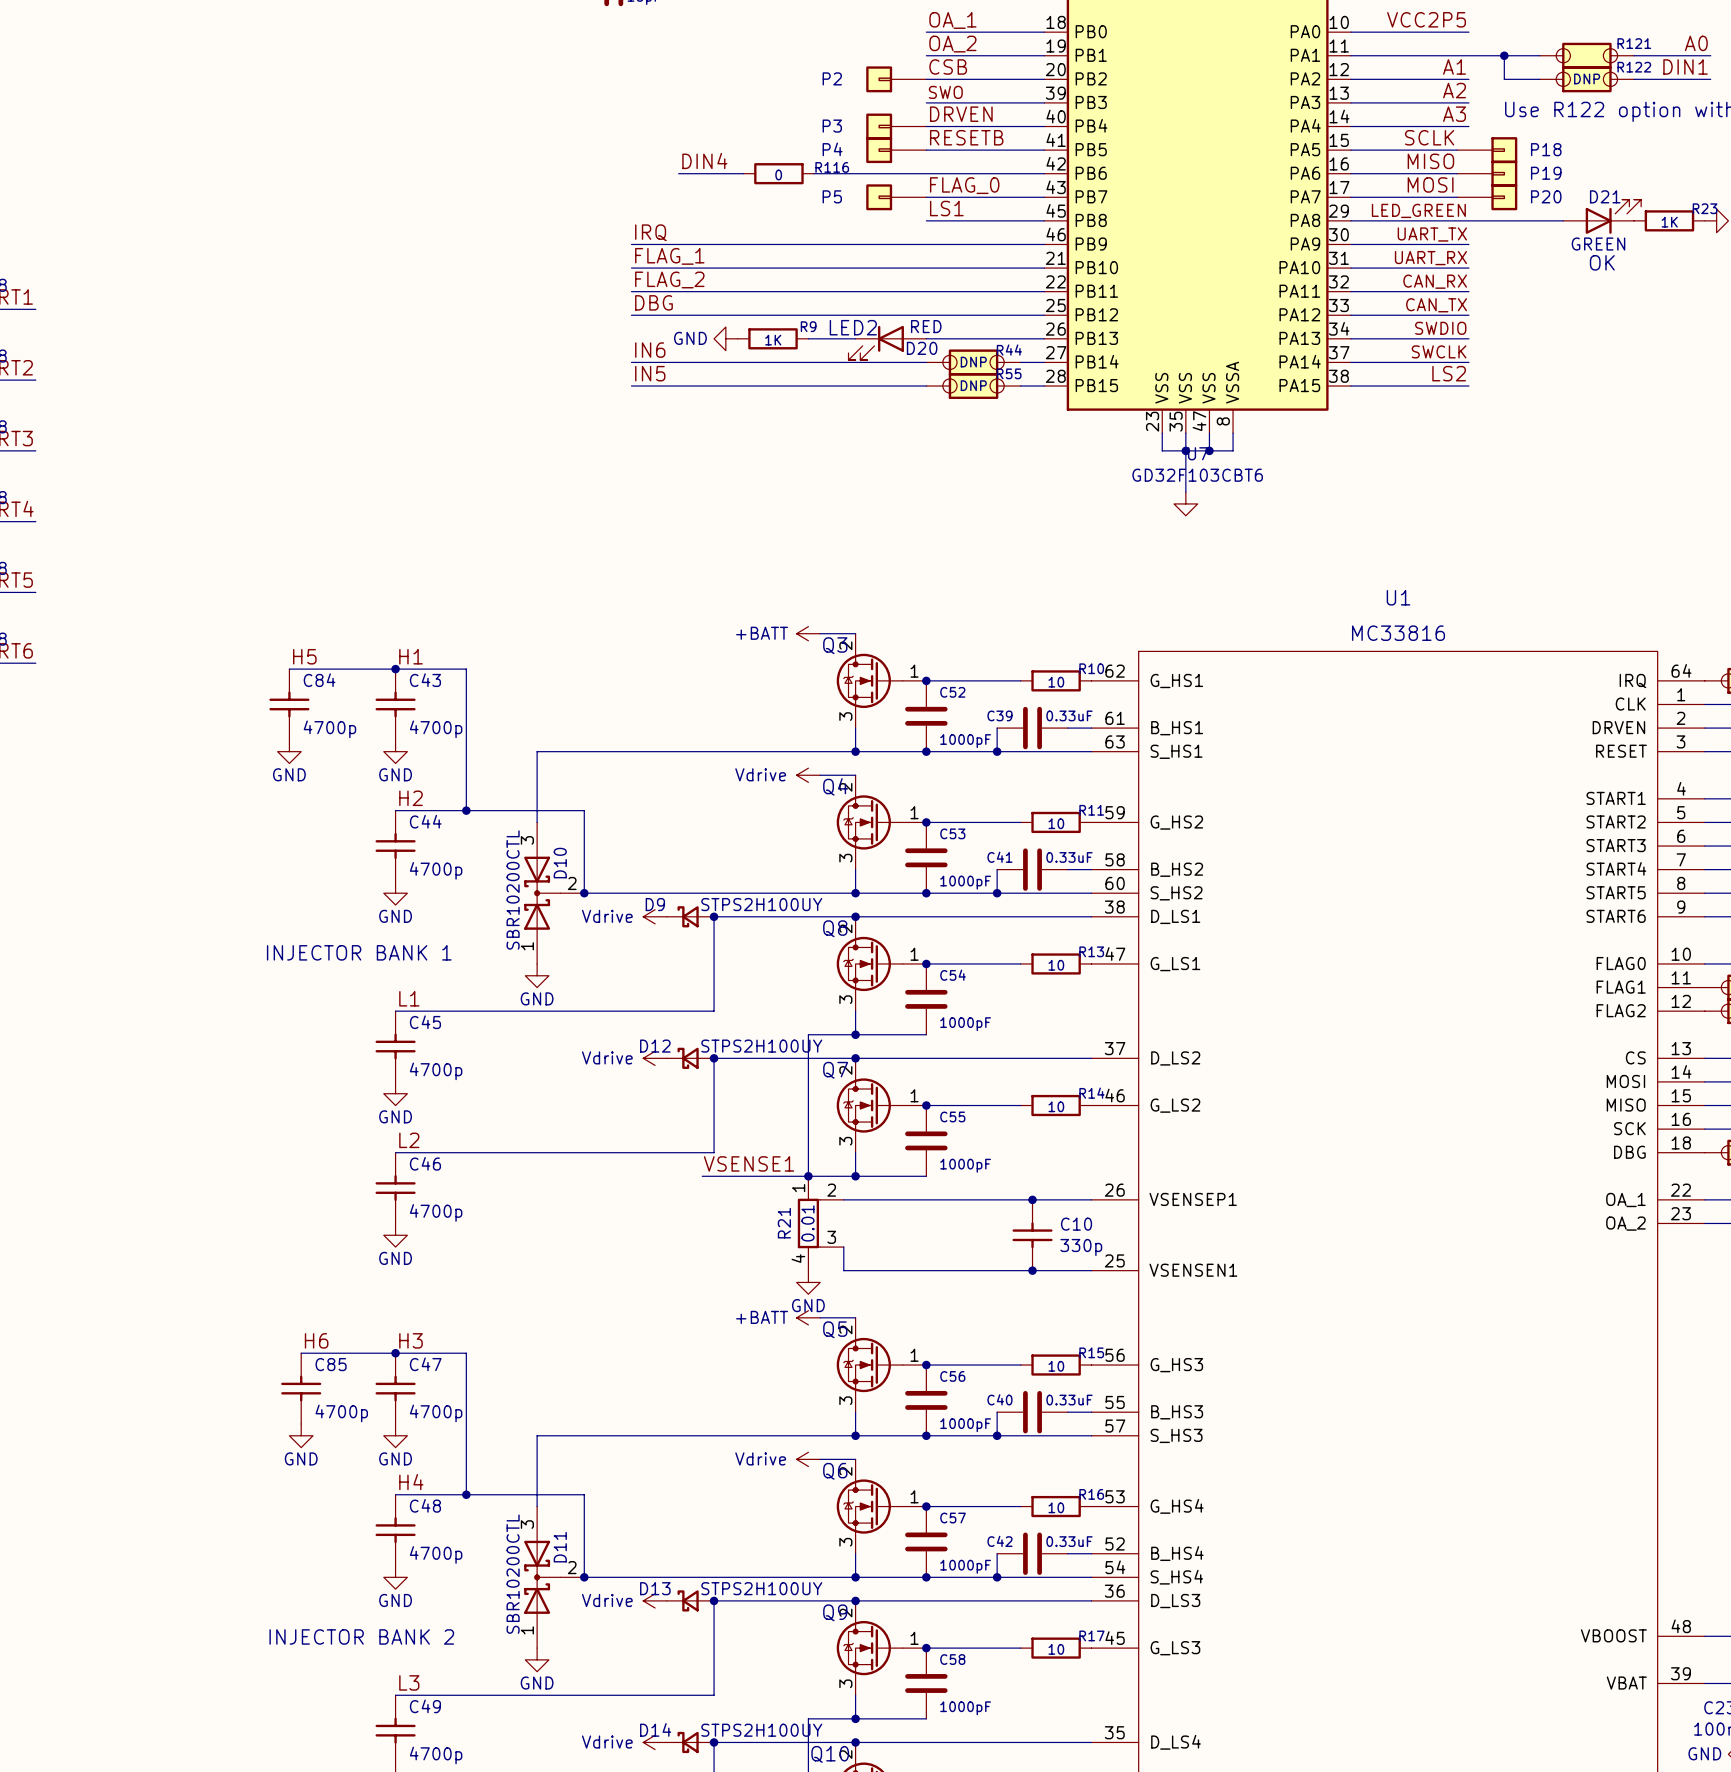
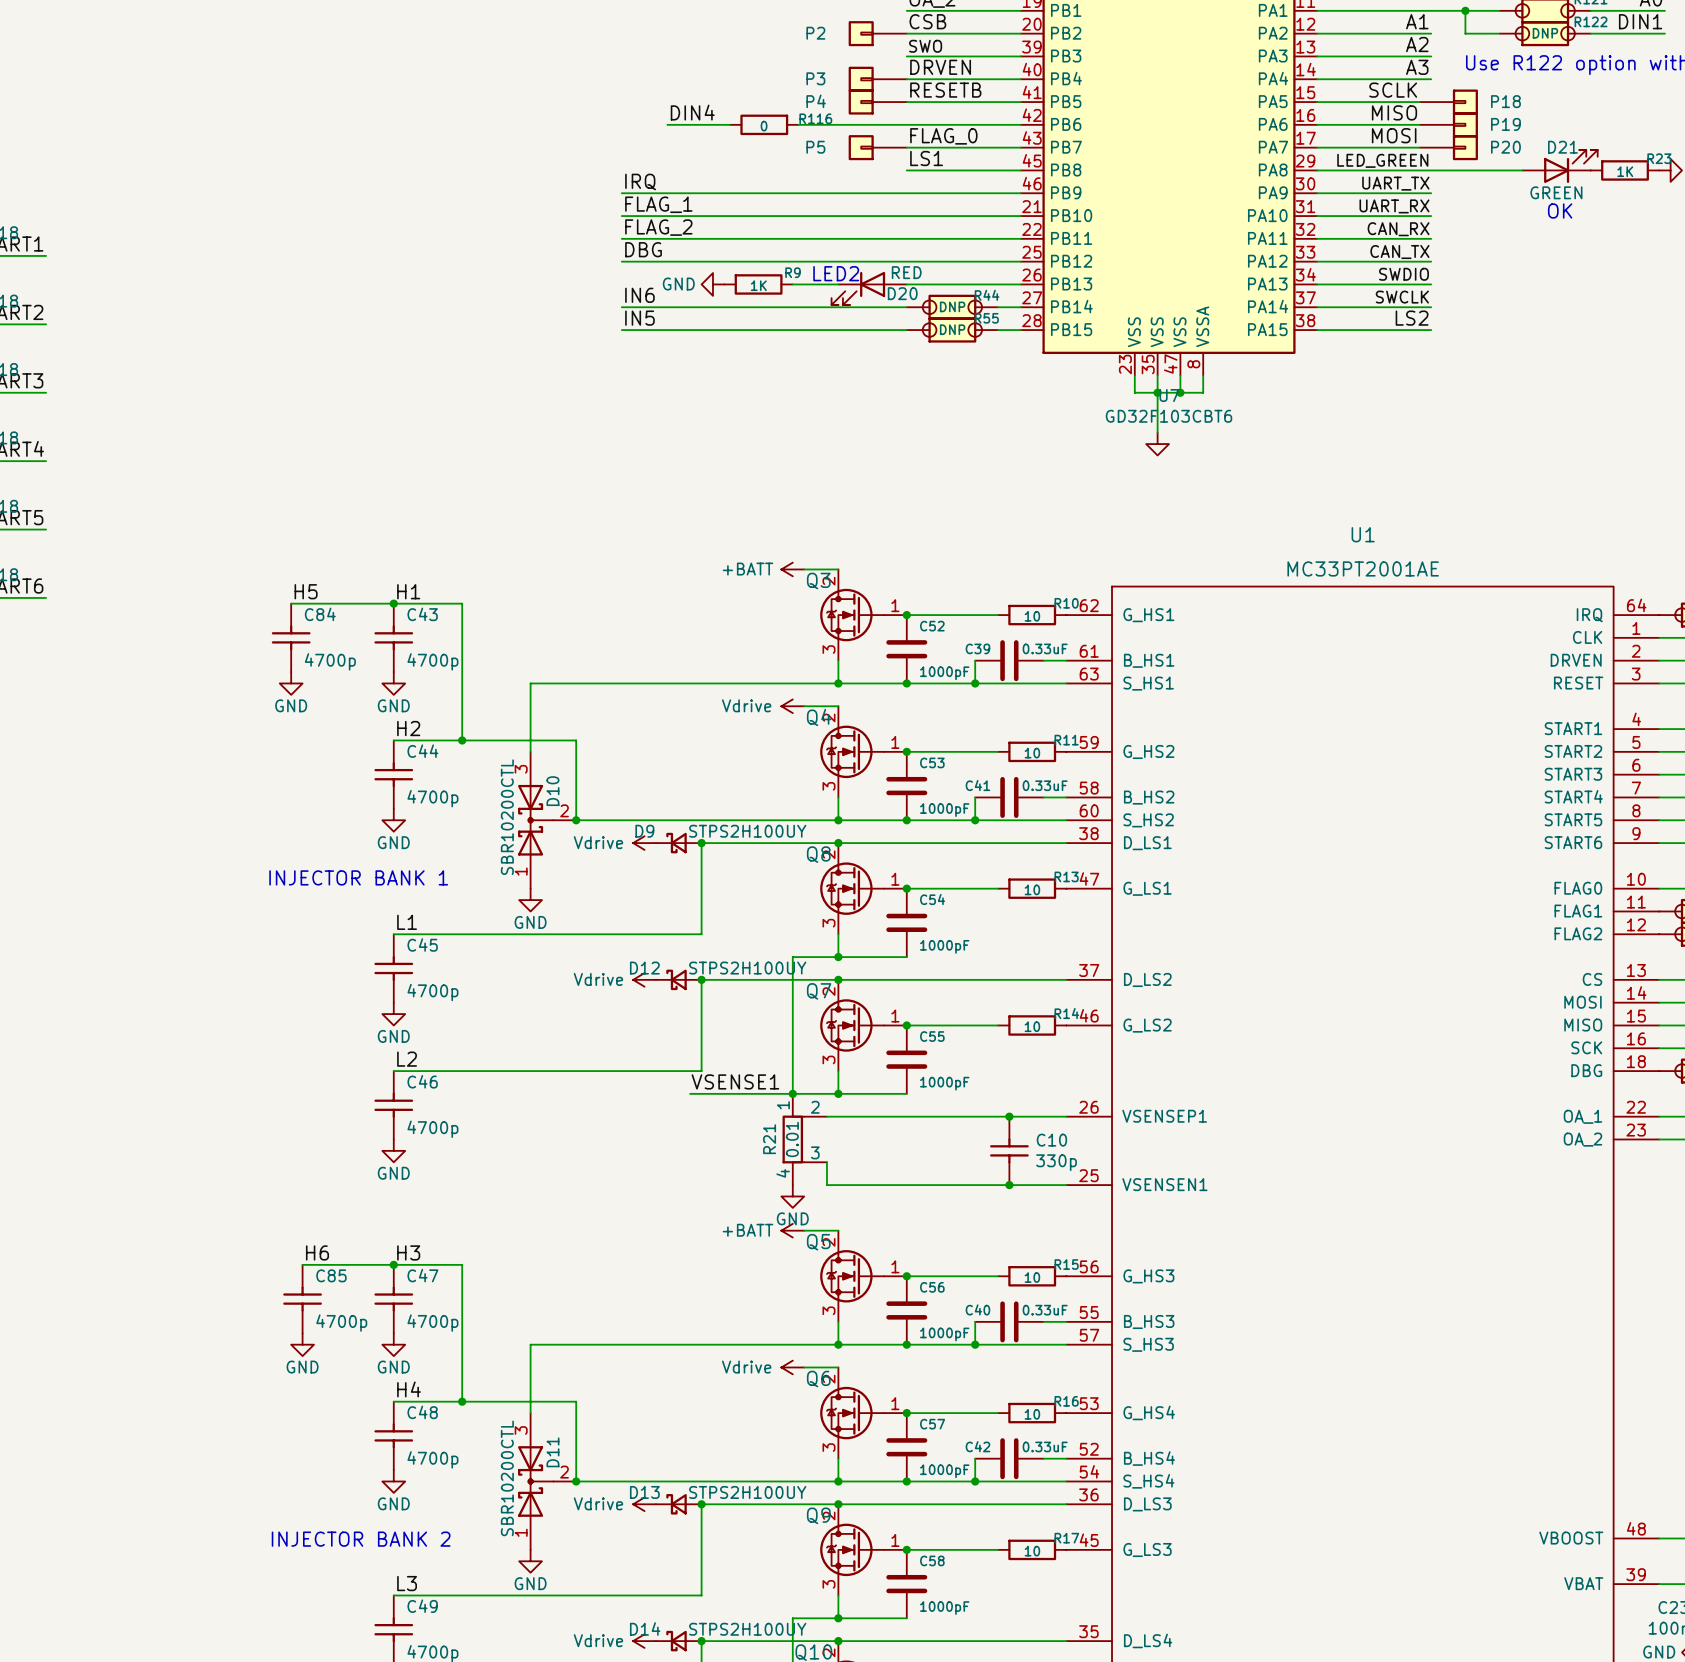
U1 value: MC33816 (1398, 633) -> MC33PT2001AE (1363, 568)

